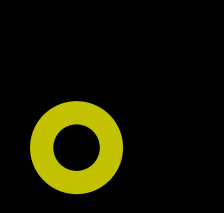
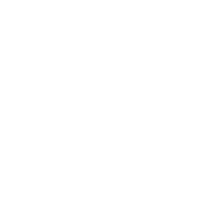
part: (76, 147) -> none

